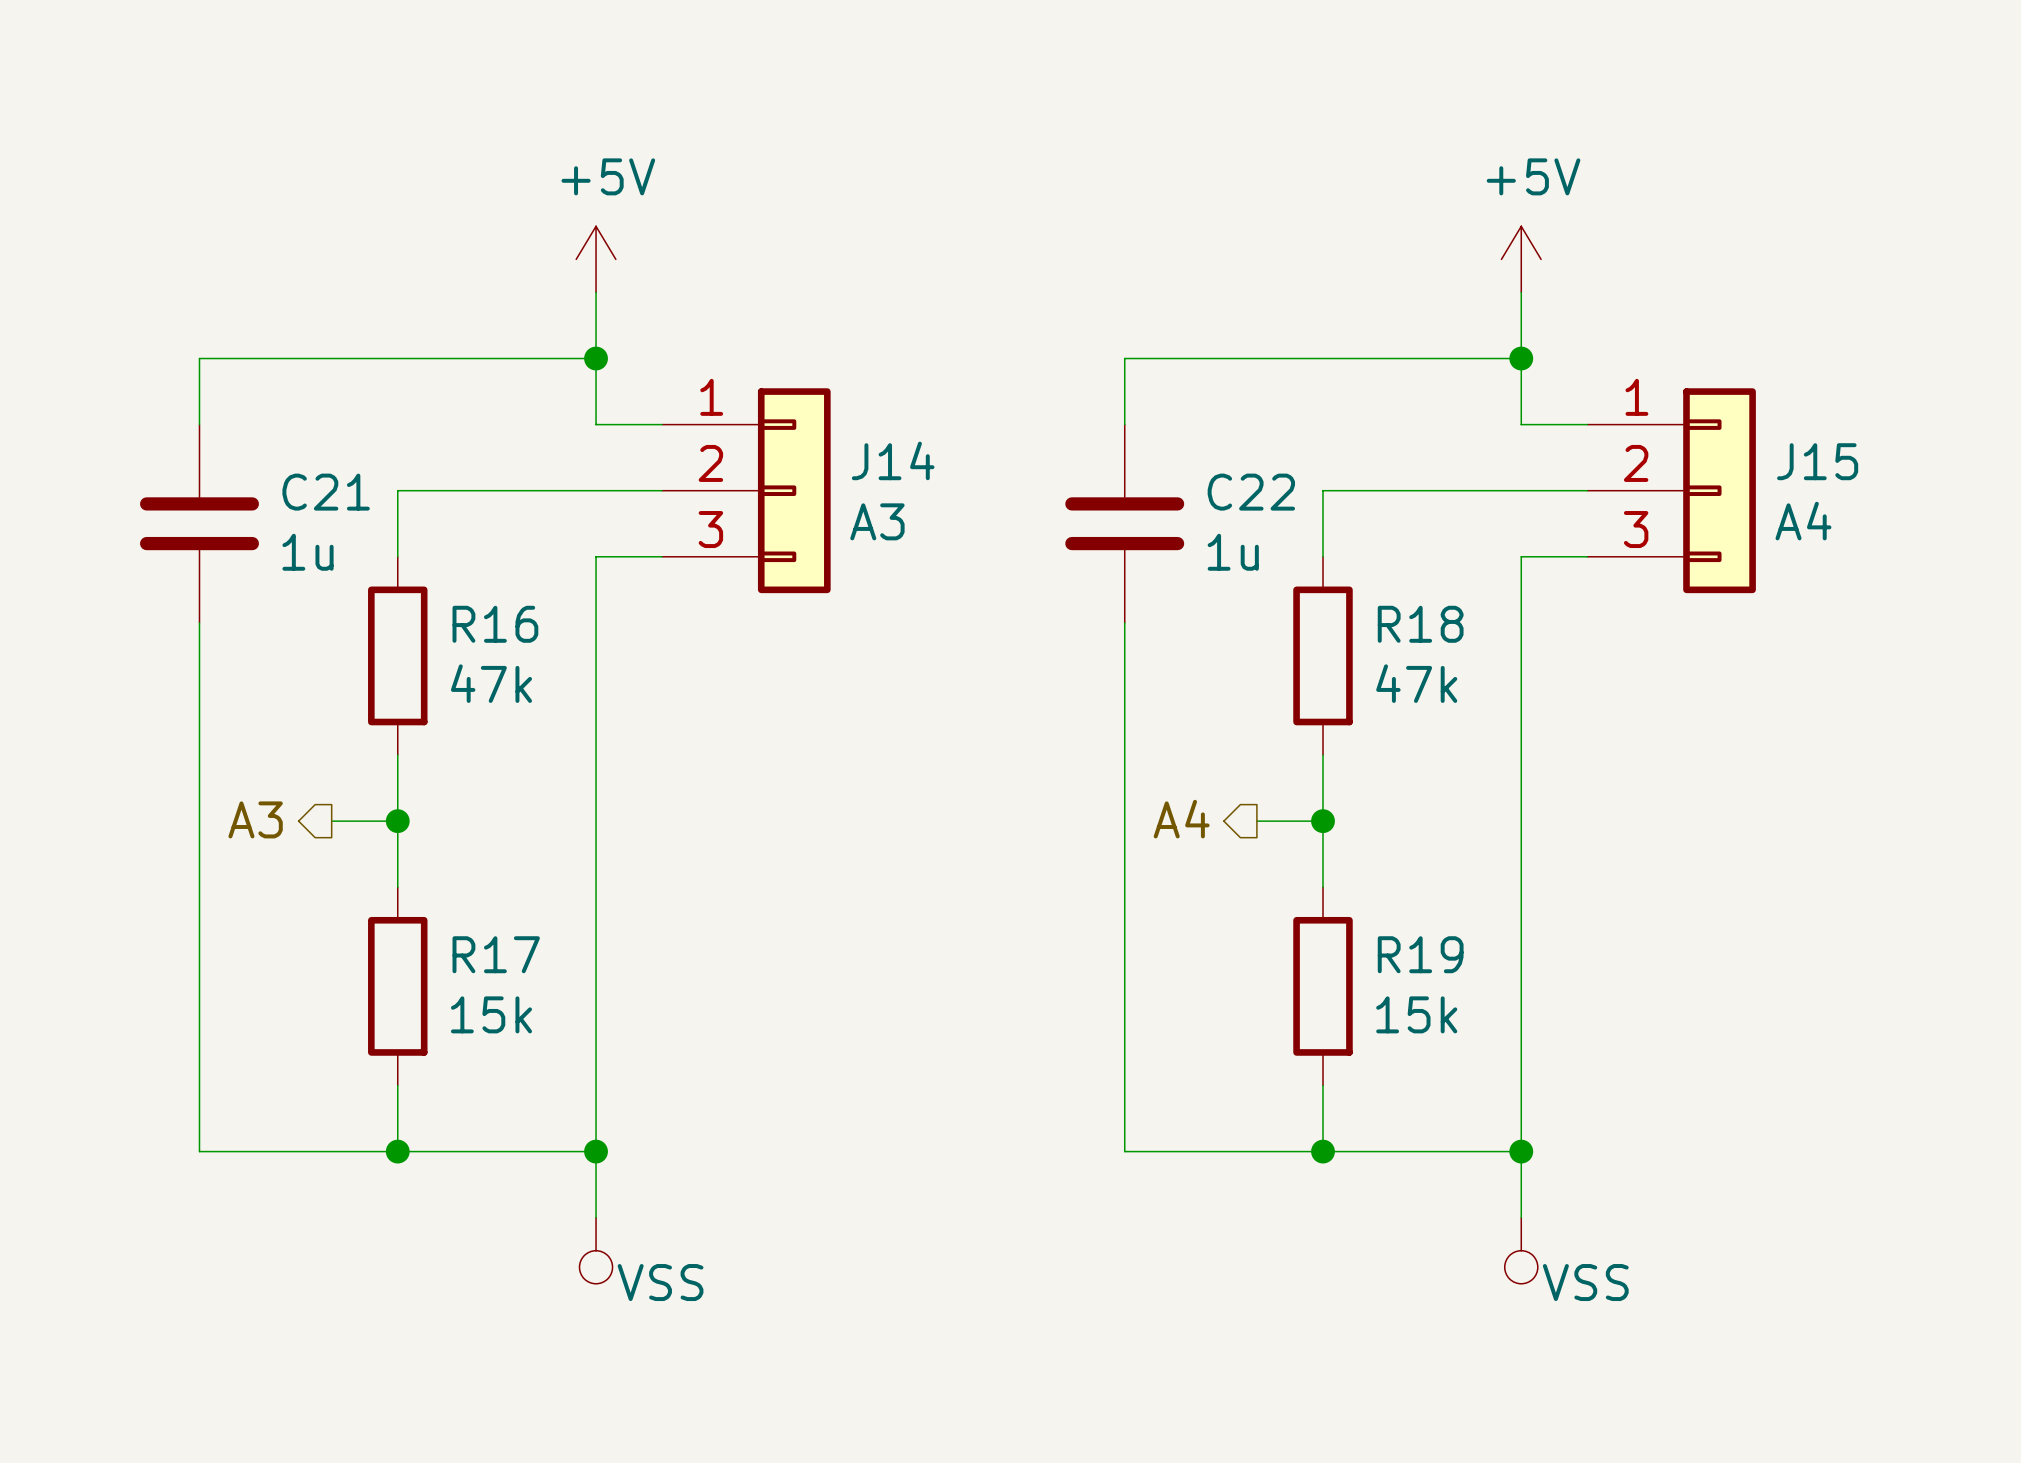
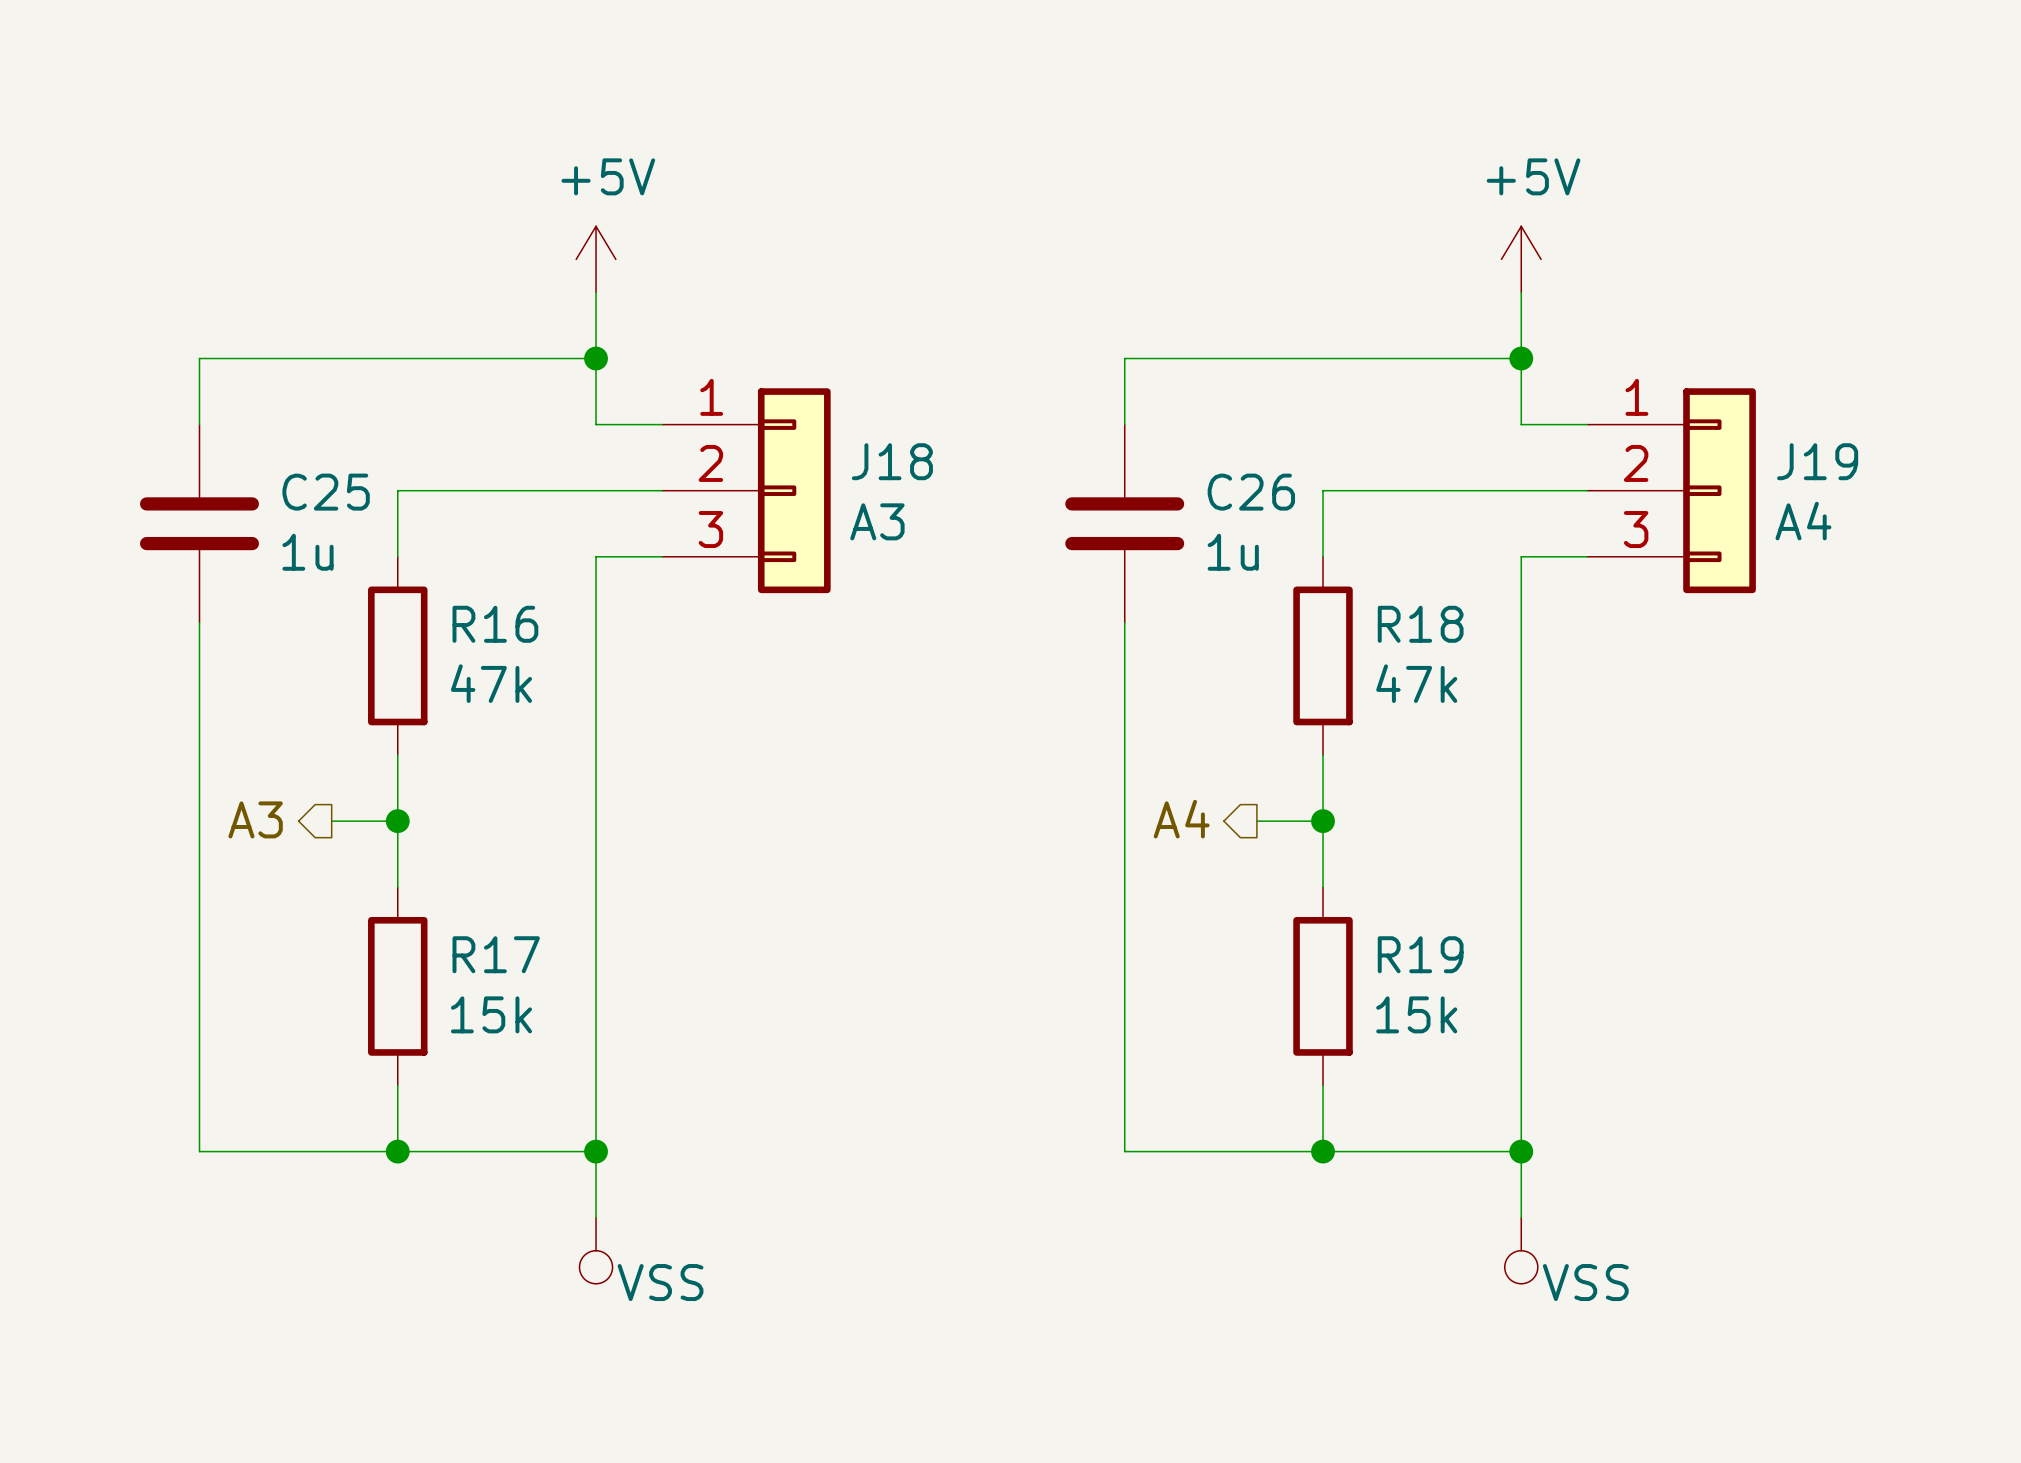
J14 name: J14 (893, 460) -> J18 (892, 461)
J15 name: J15 (1817, 461) -> J19 (1817, 461)
C21 name: C21 (326, 492) -> C25 (326, 492)
C22 name: C22 (1251, 492) -> C26 (1251, 492)

